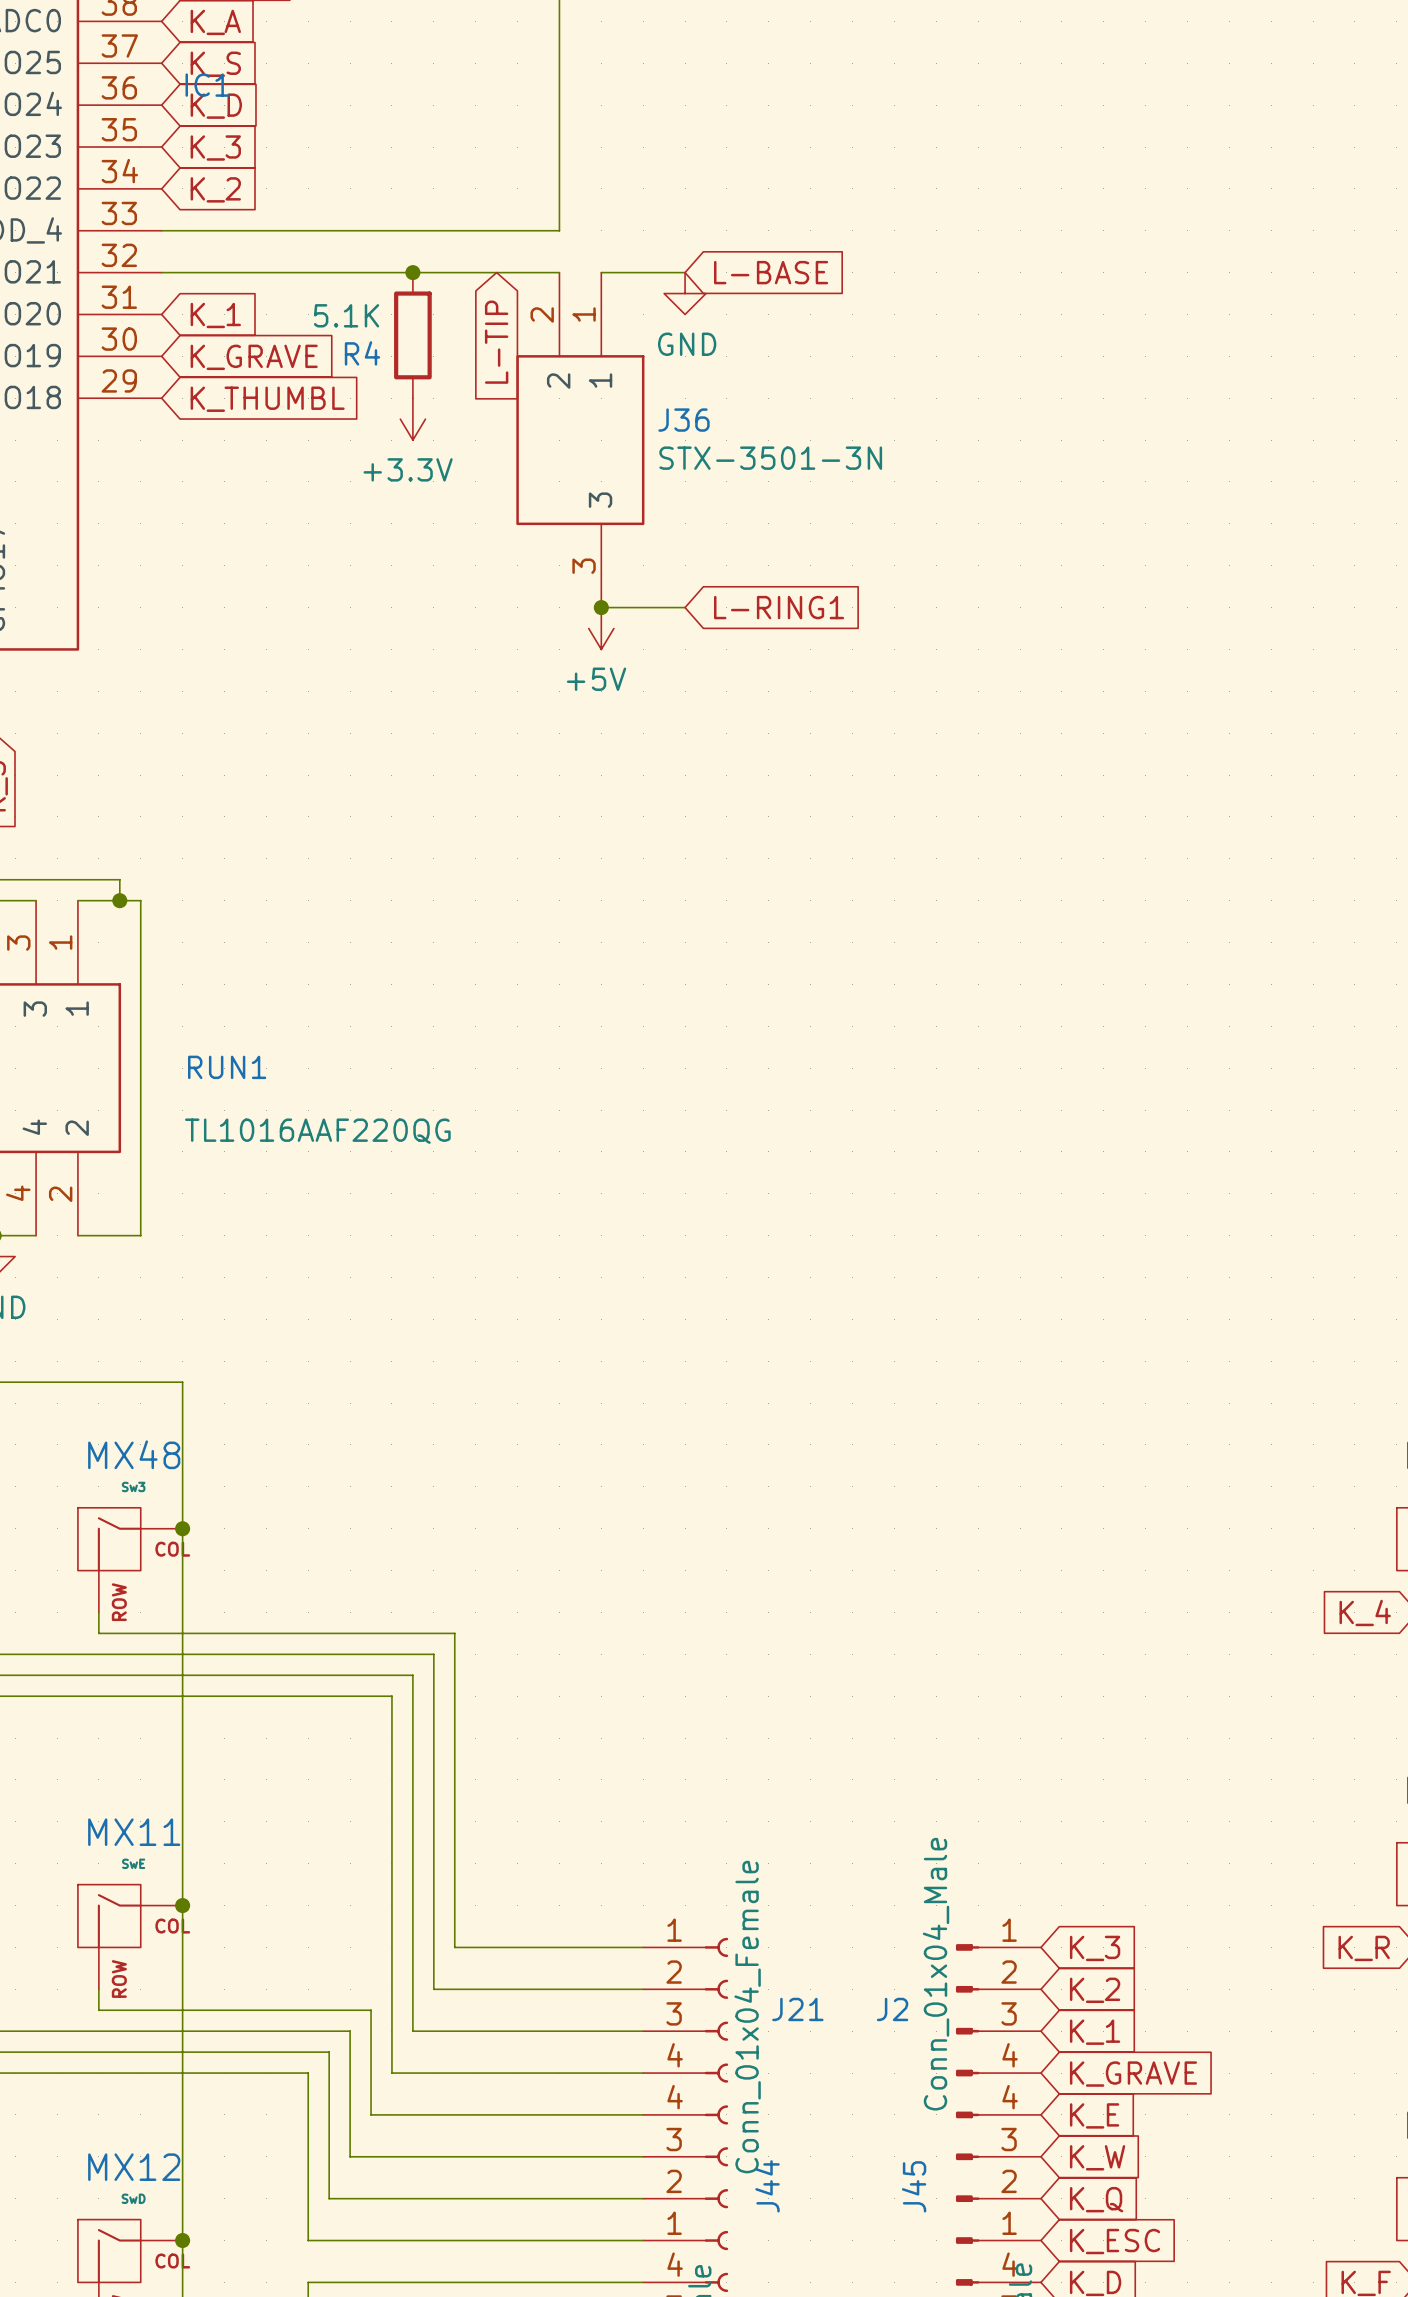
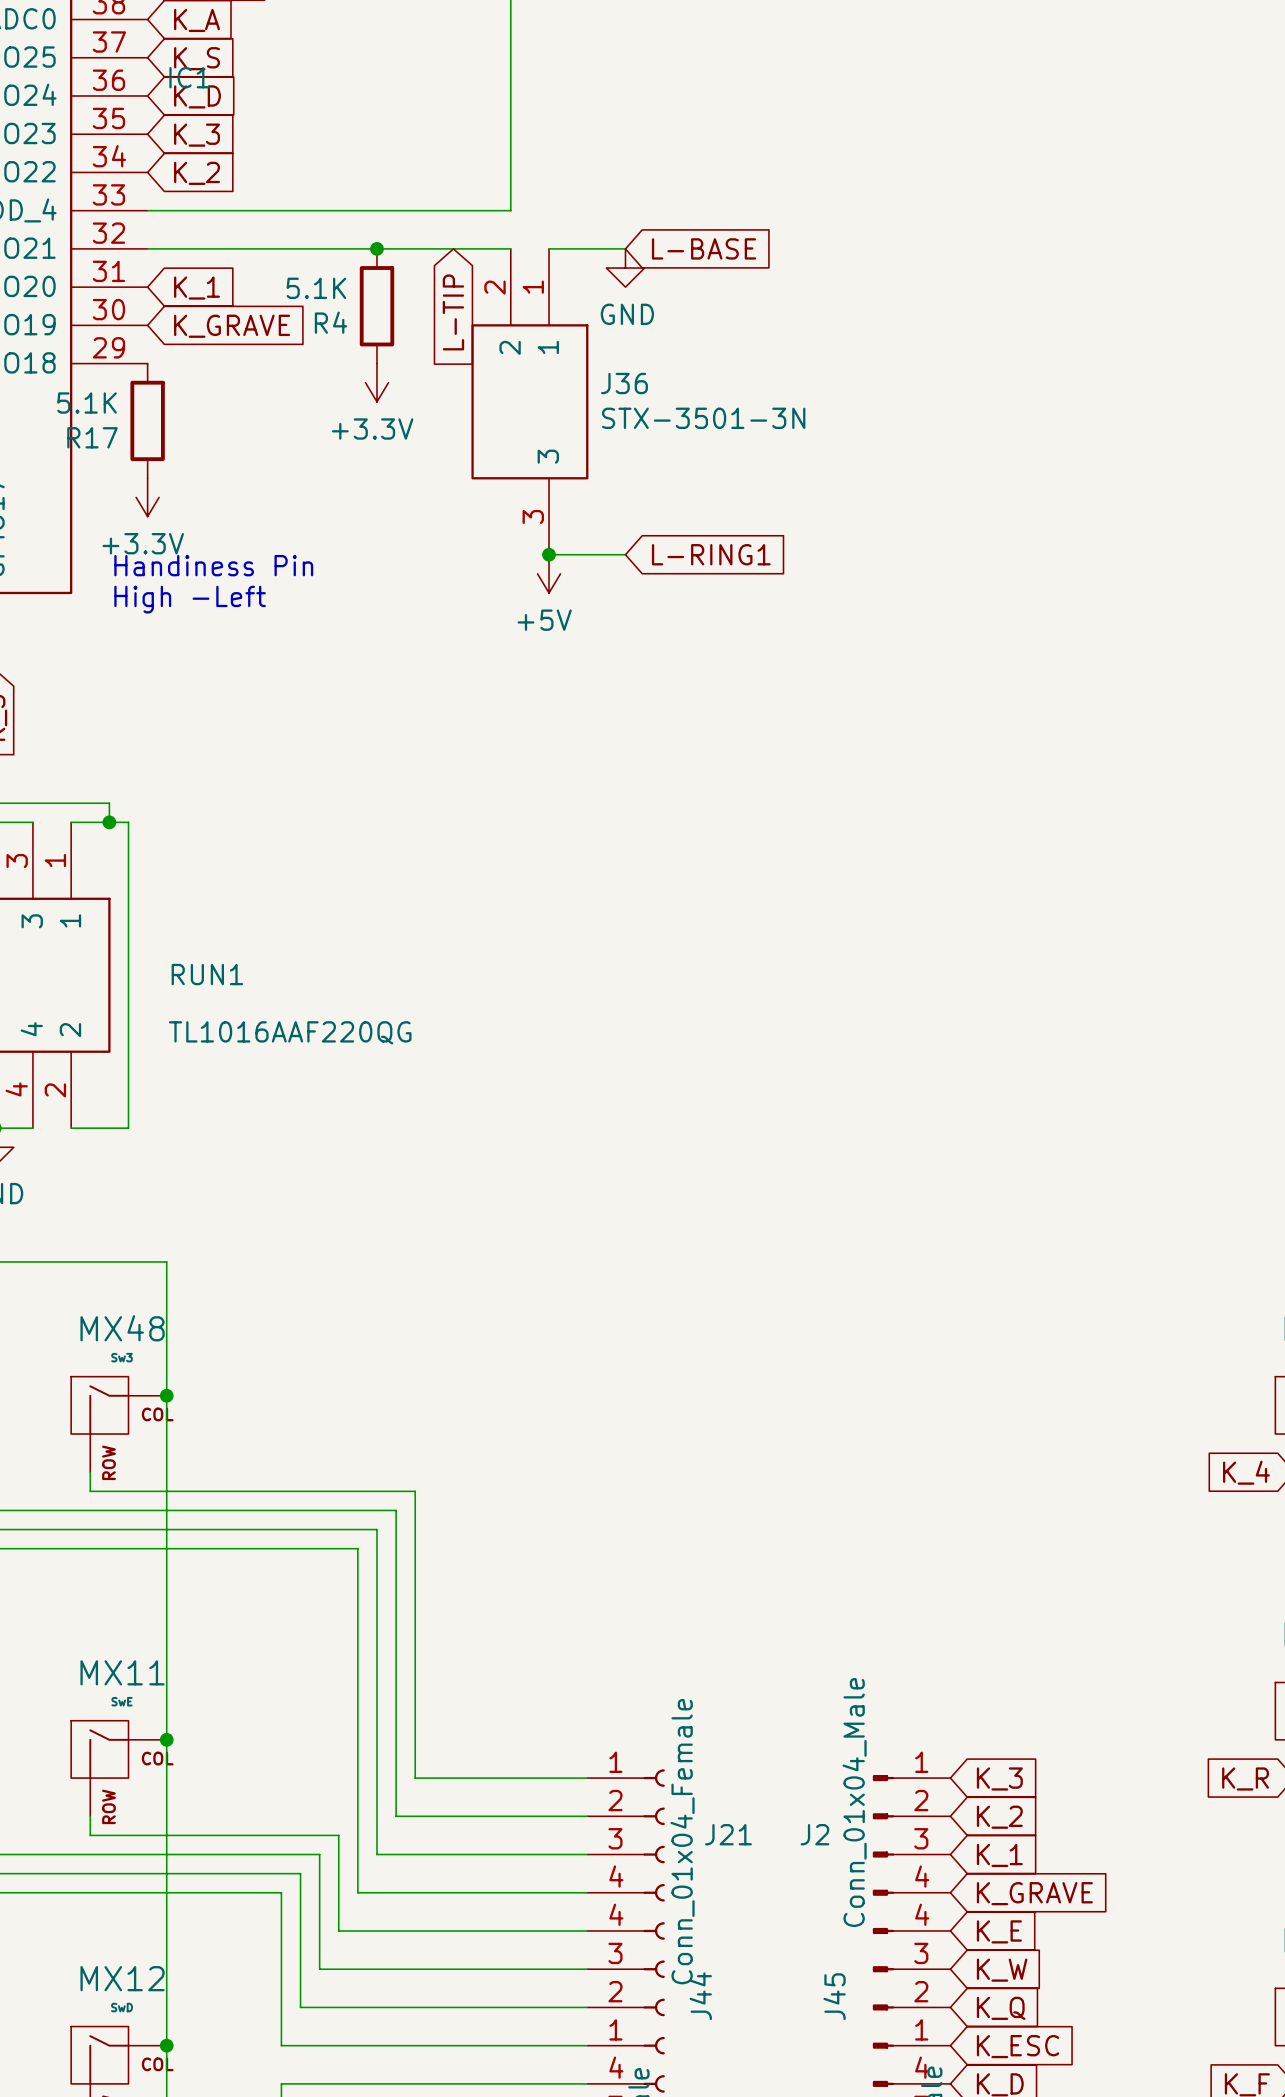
global label: K_THUMBL (267, 399) -> none
R17: none -> 5.1K (147, 420)
power symbol: none -> +3.3V (147, 497)
text: none -> Handiness Pin (213, 565)
text: none -> High -Left (190, 599)

